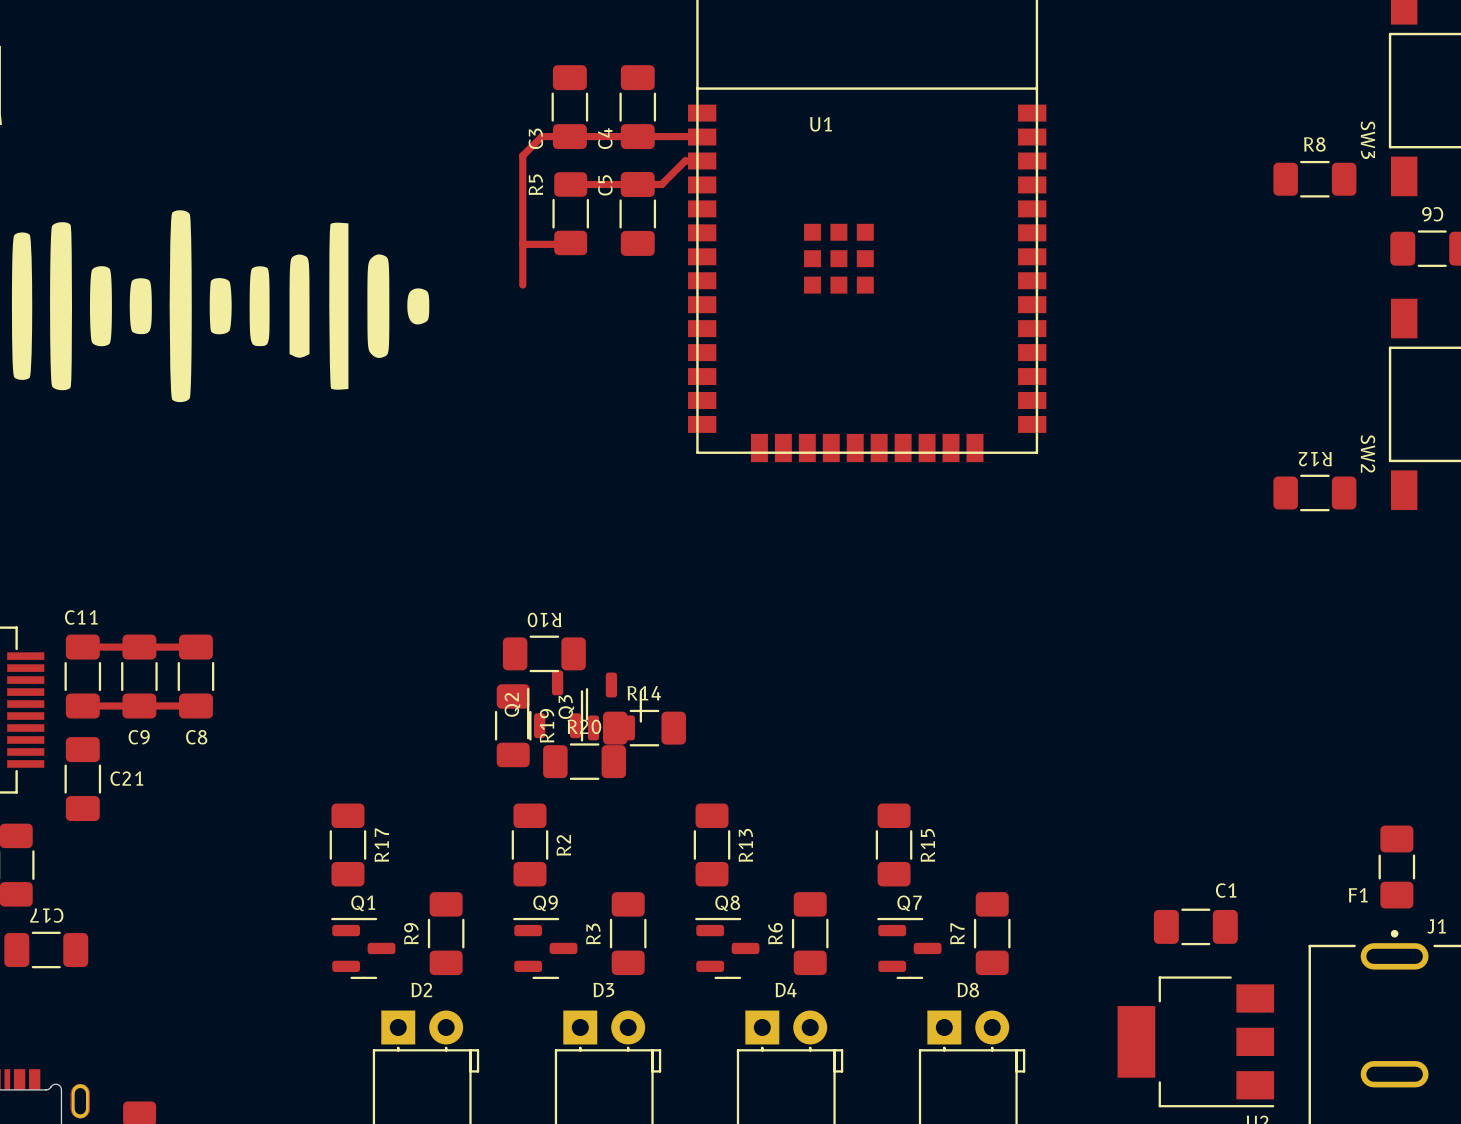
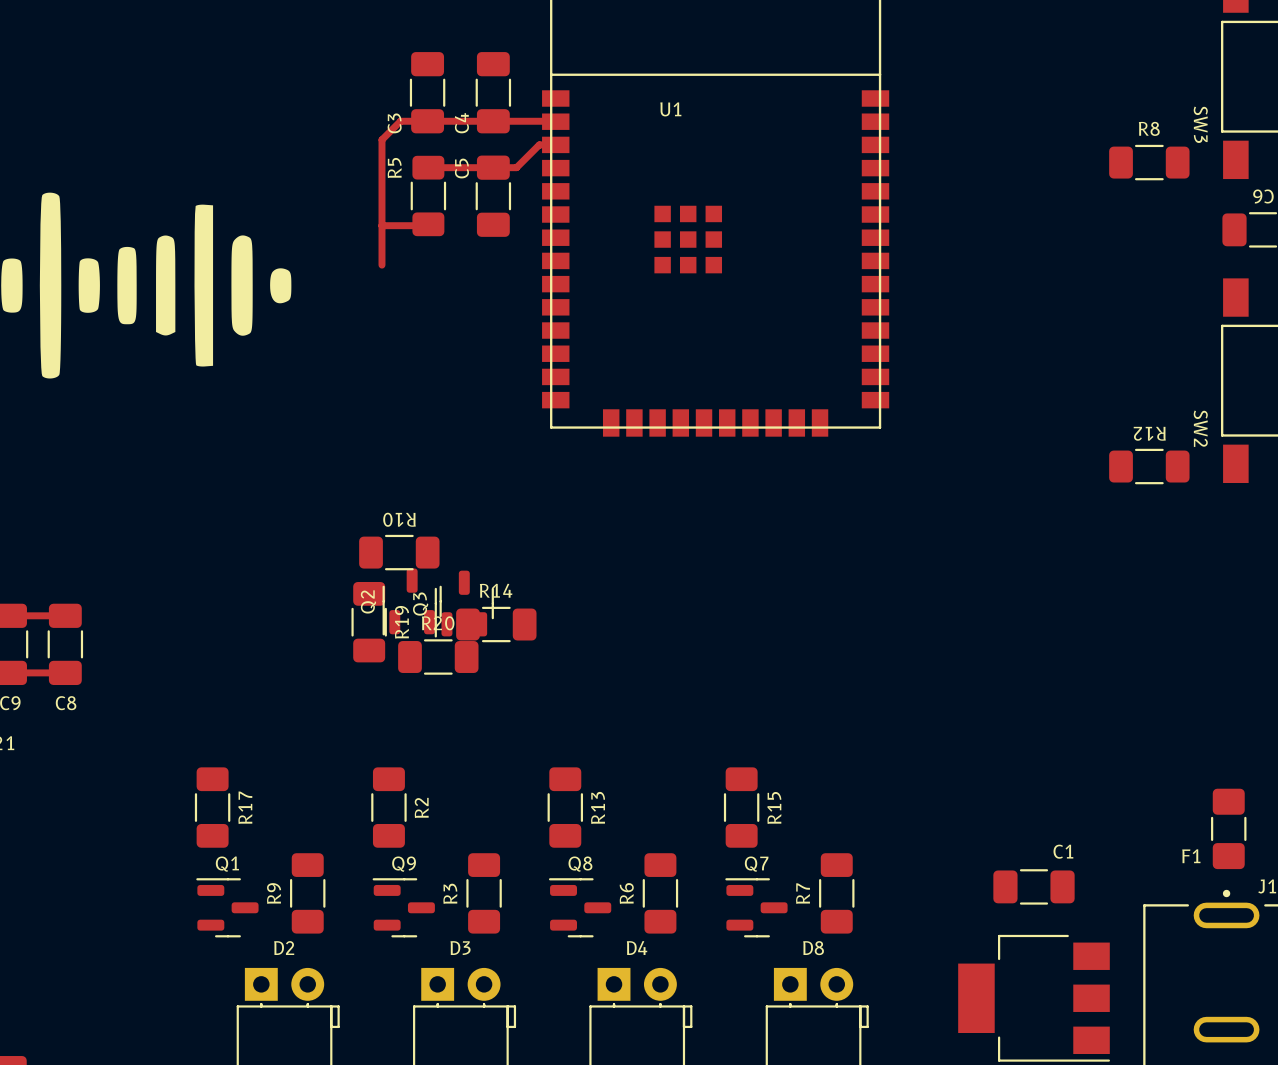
R10 position: (544, 653) -> (399, 552)
Q2 position: (557, 704) -> (412, 601)
Q3 position: (611, 707) -> (464, 604)
R19 position: (513, 725) -> (369, 622)
R14 position: (644, 728) -> (496, 624)
R20 position: (584, 761) -> (438, 657)

